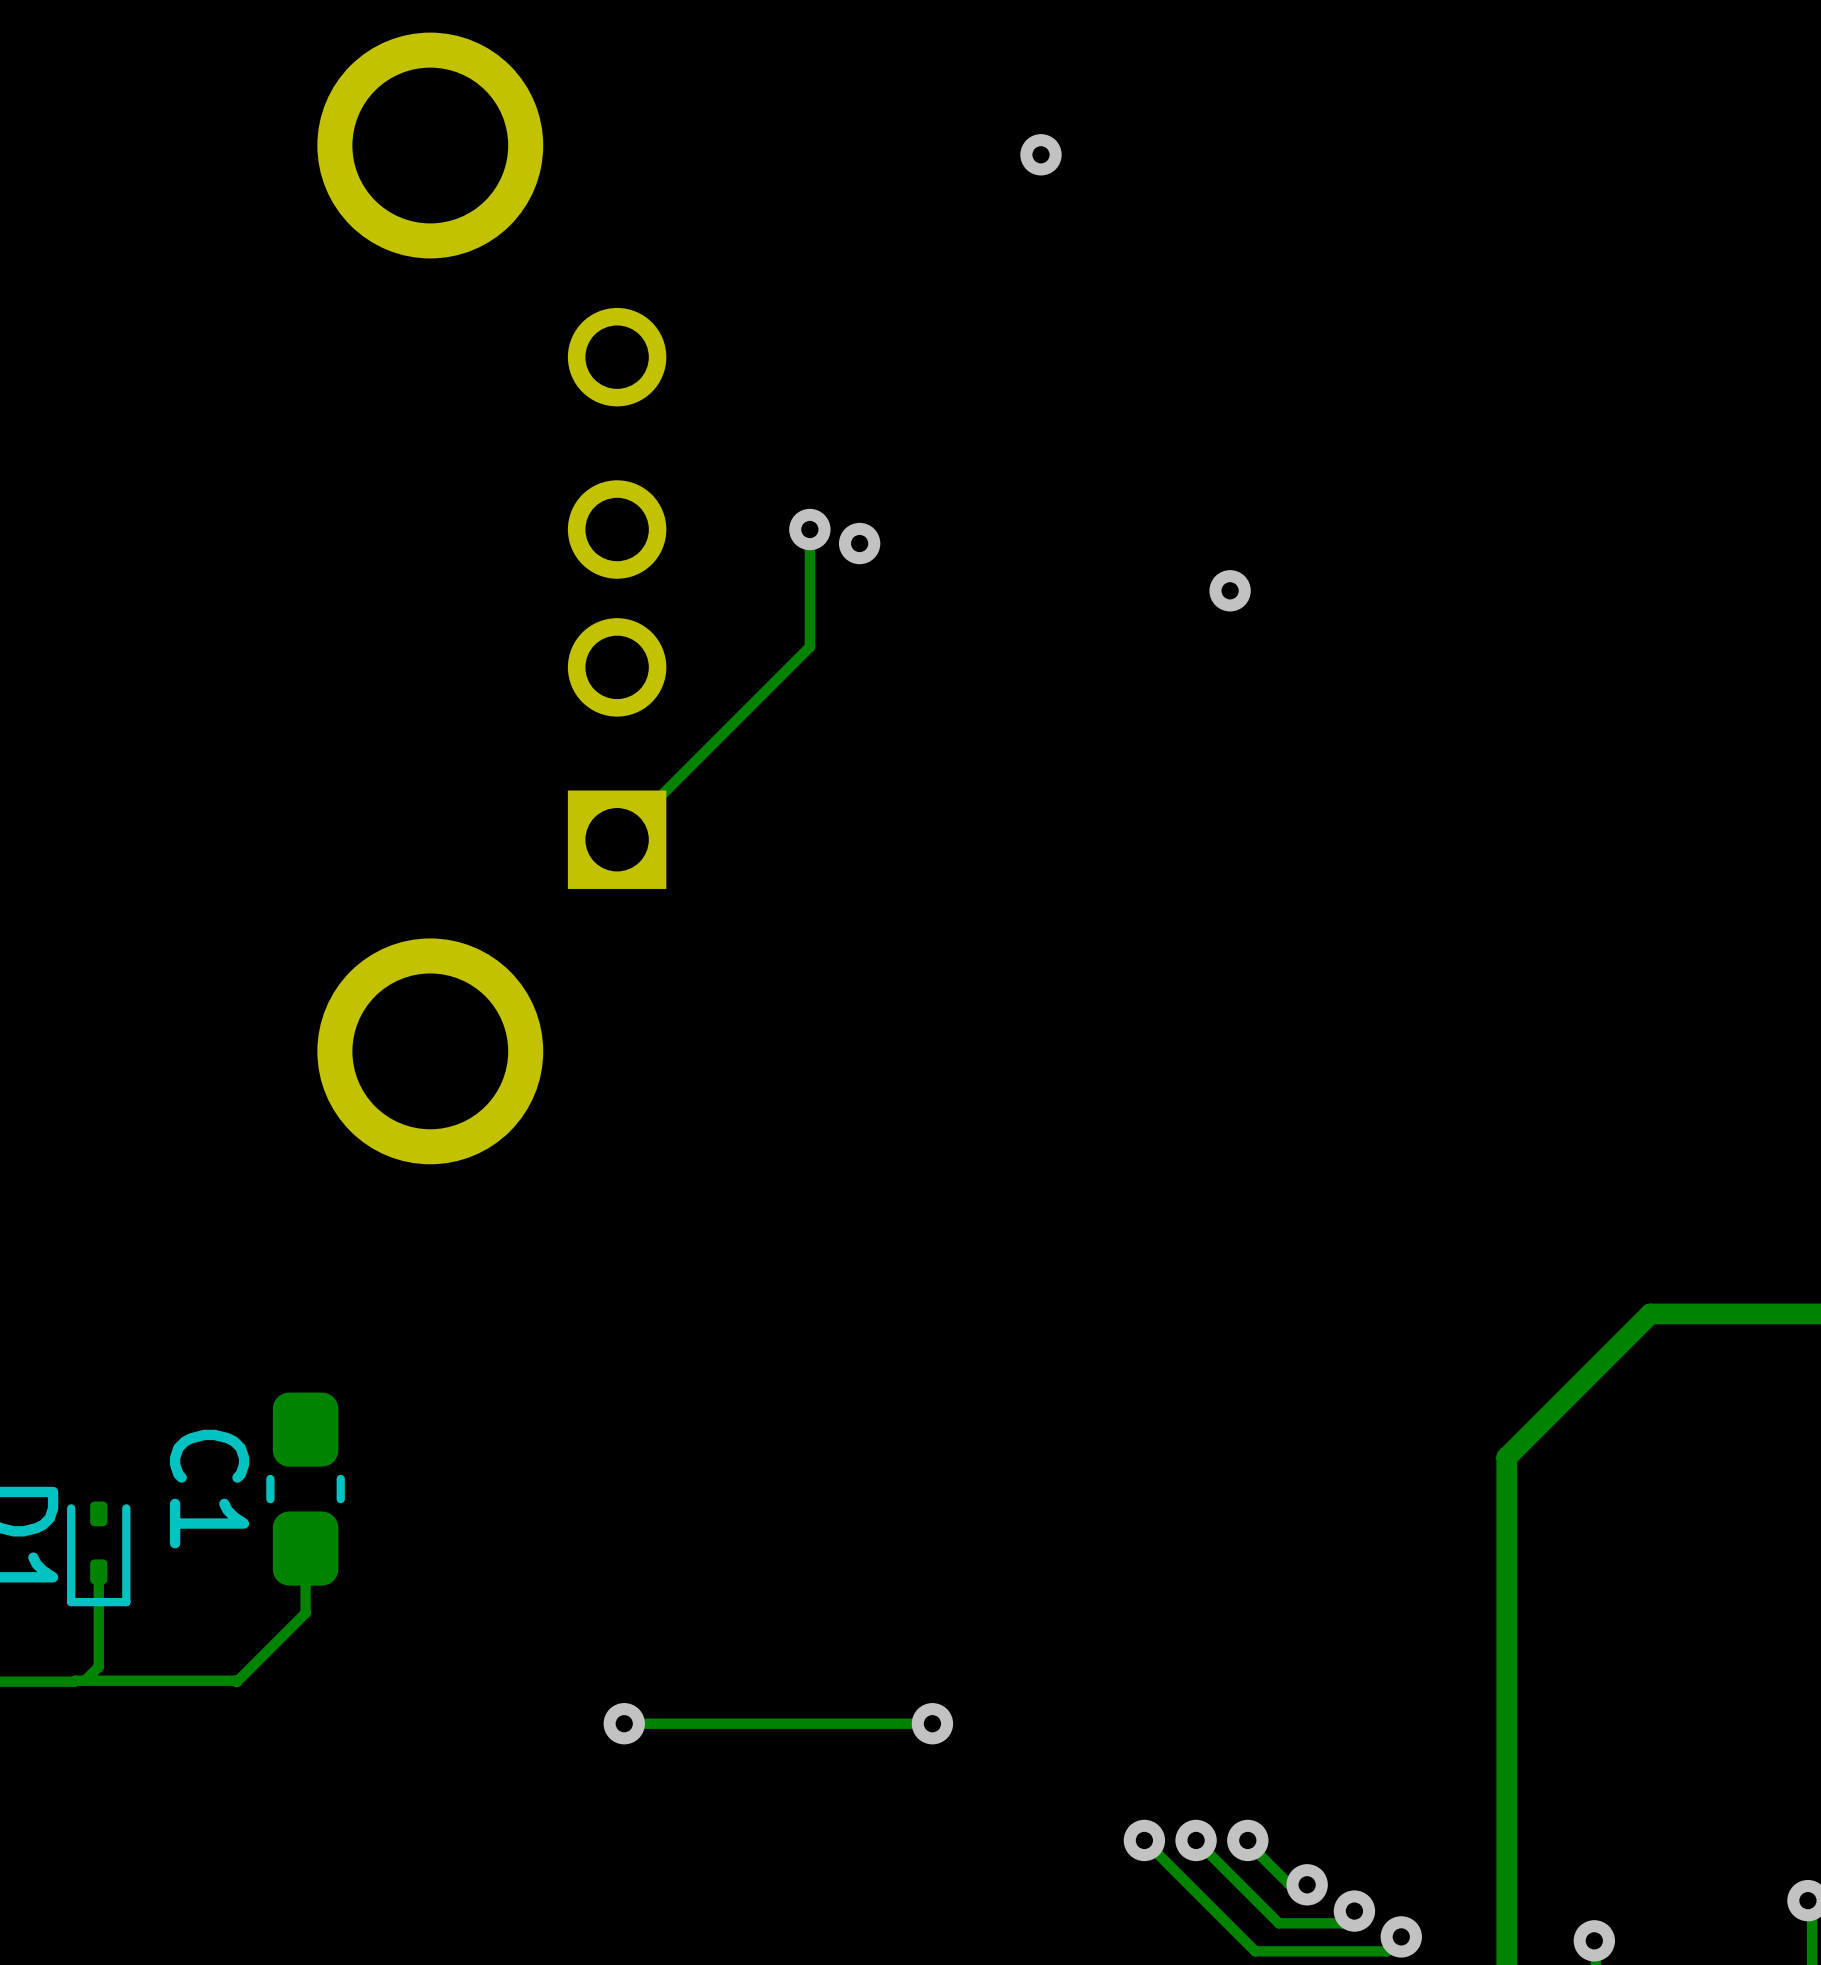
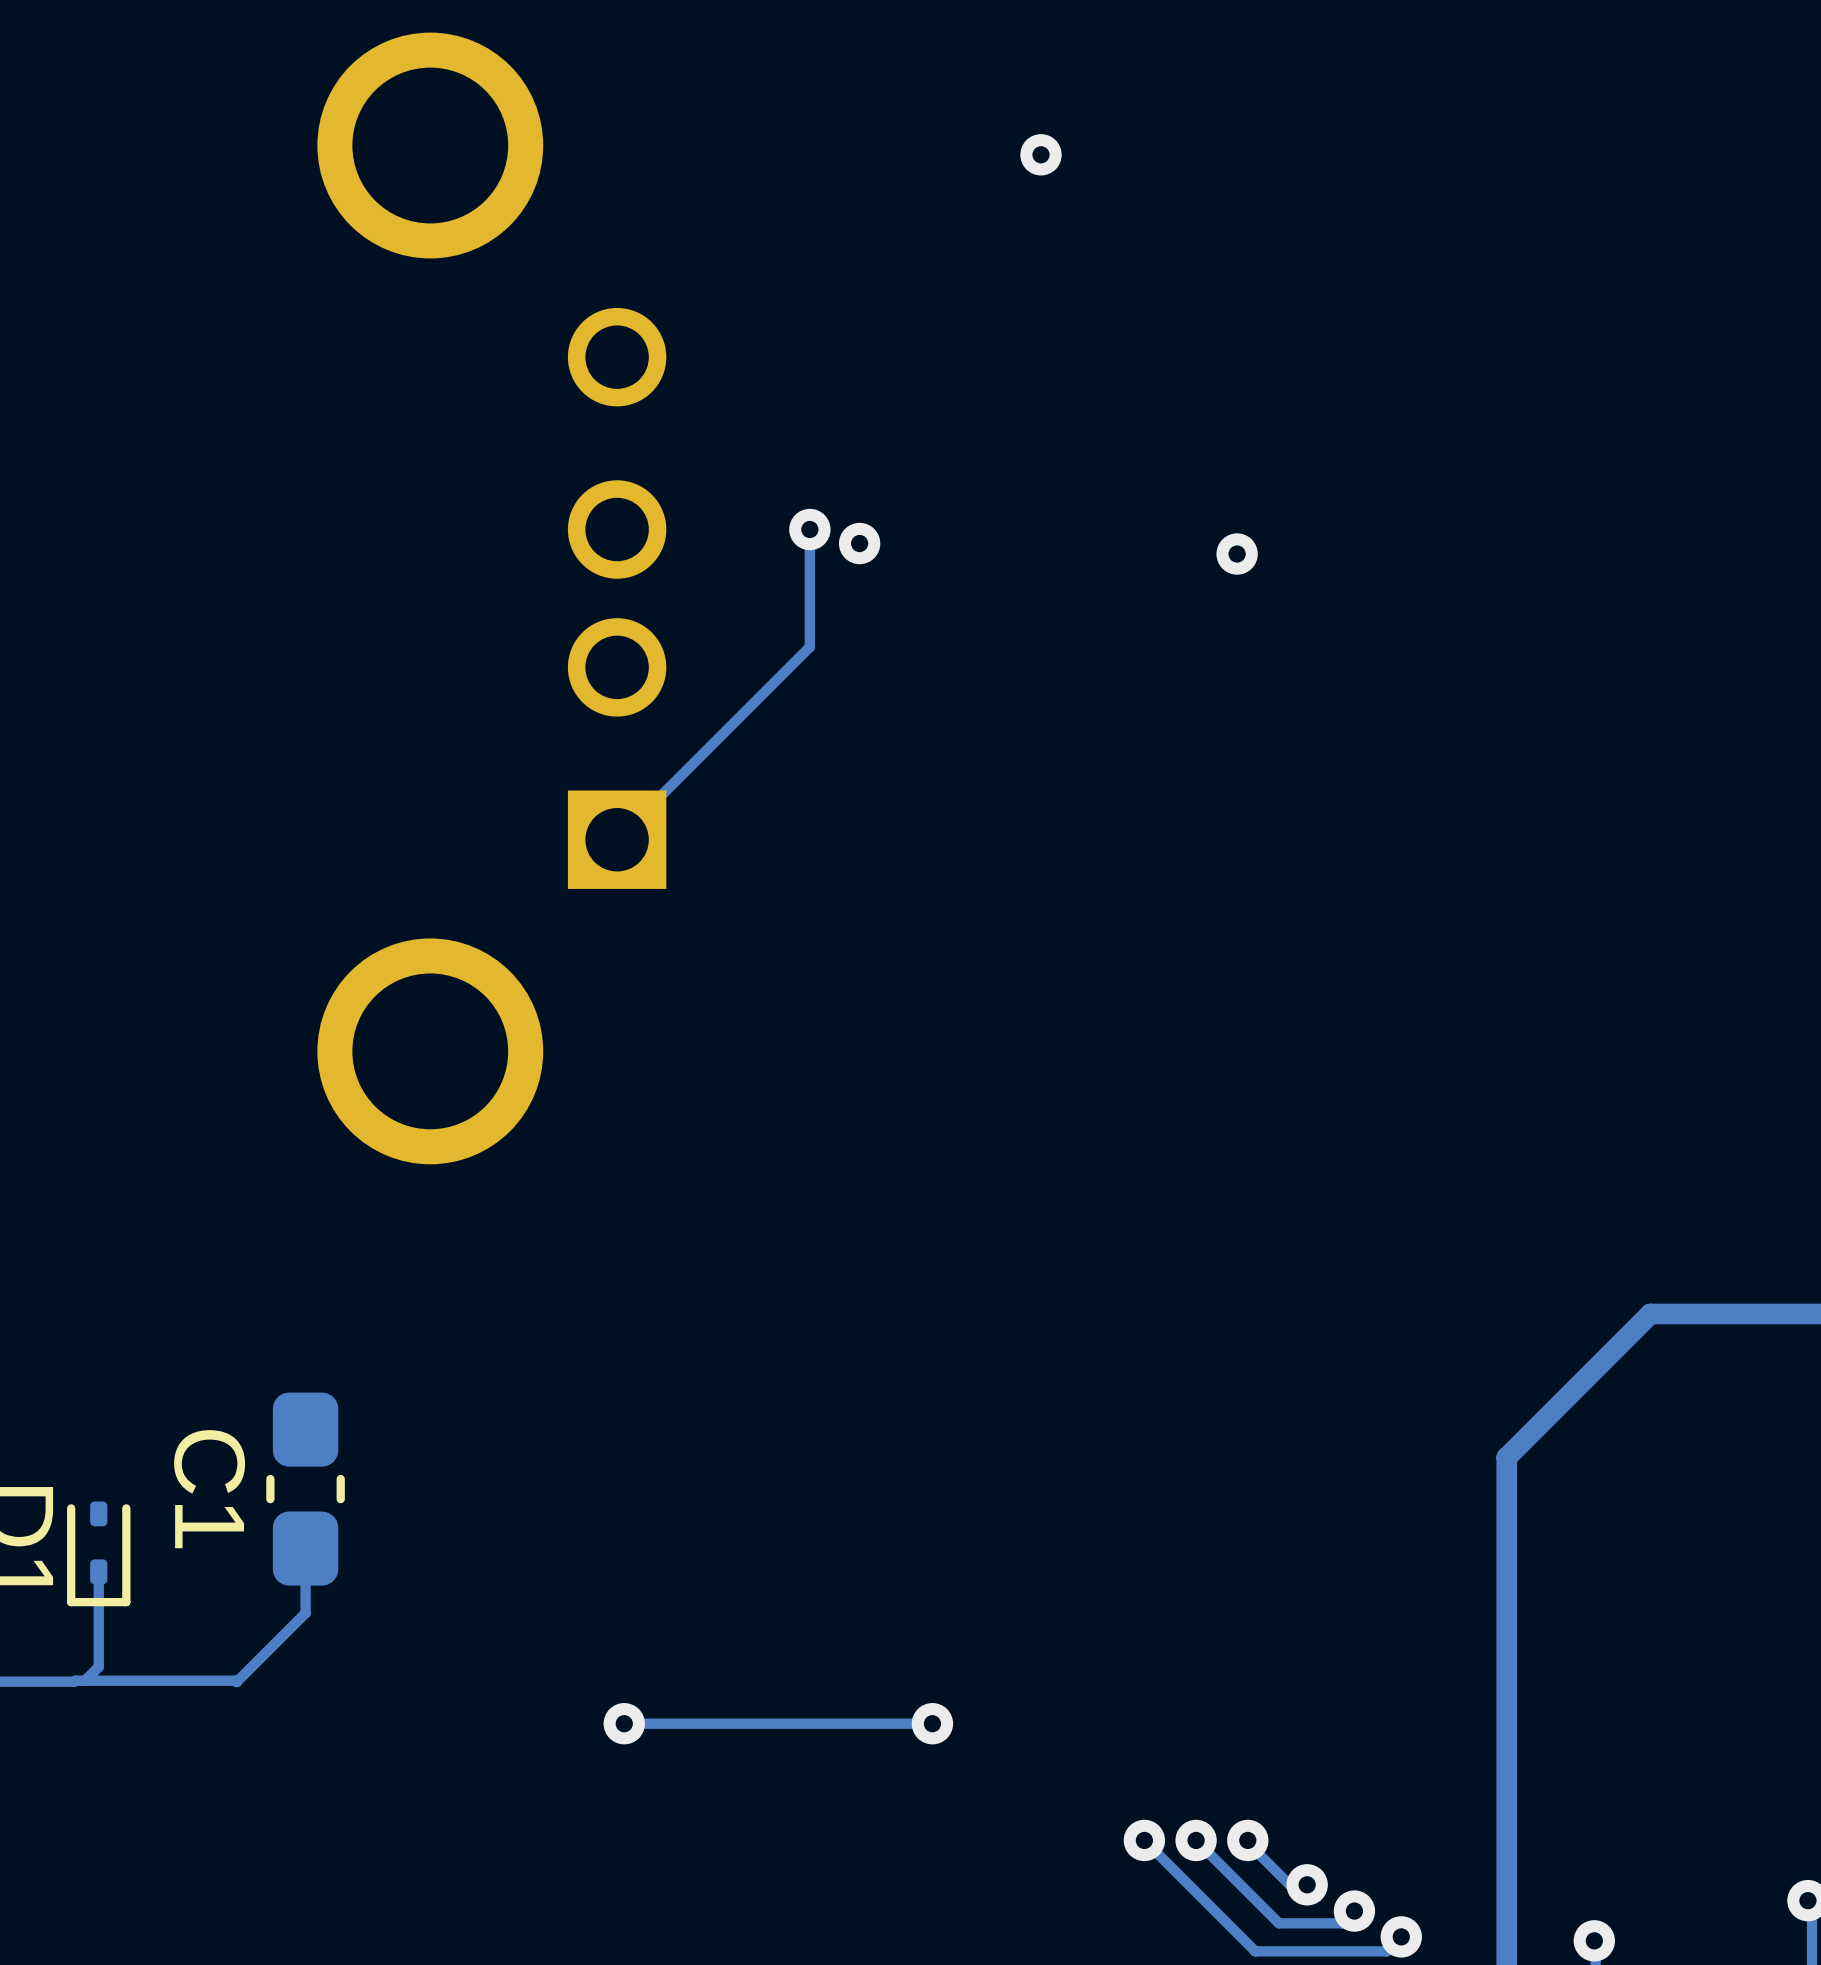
via position: (1230, 590) -> (1237, 554)

